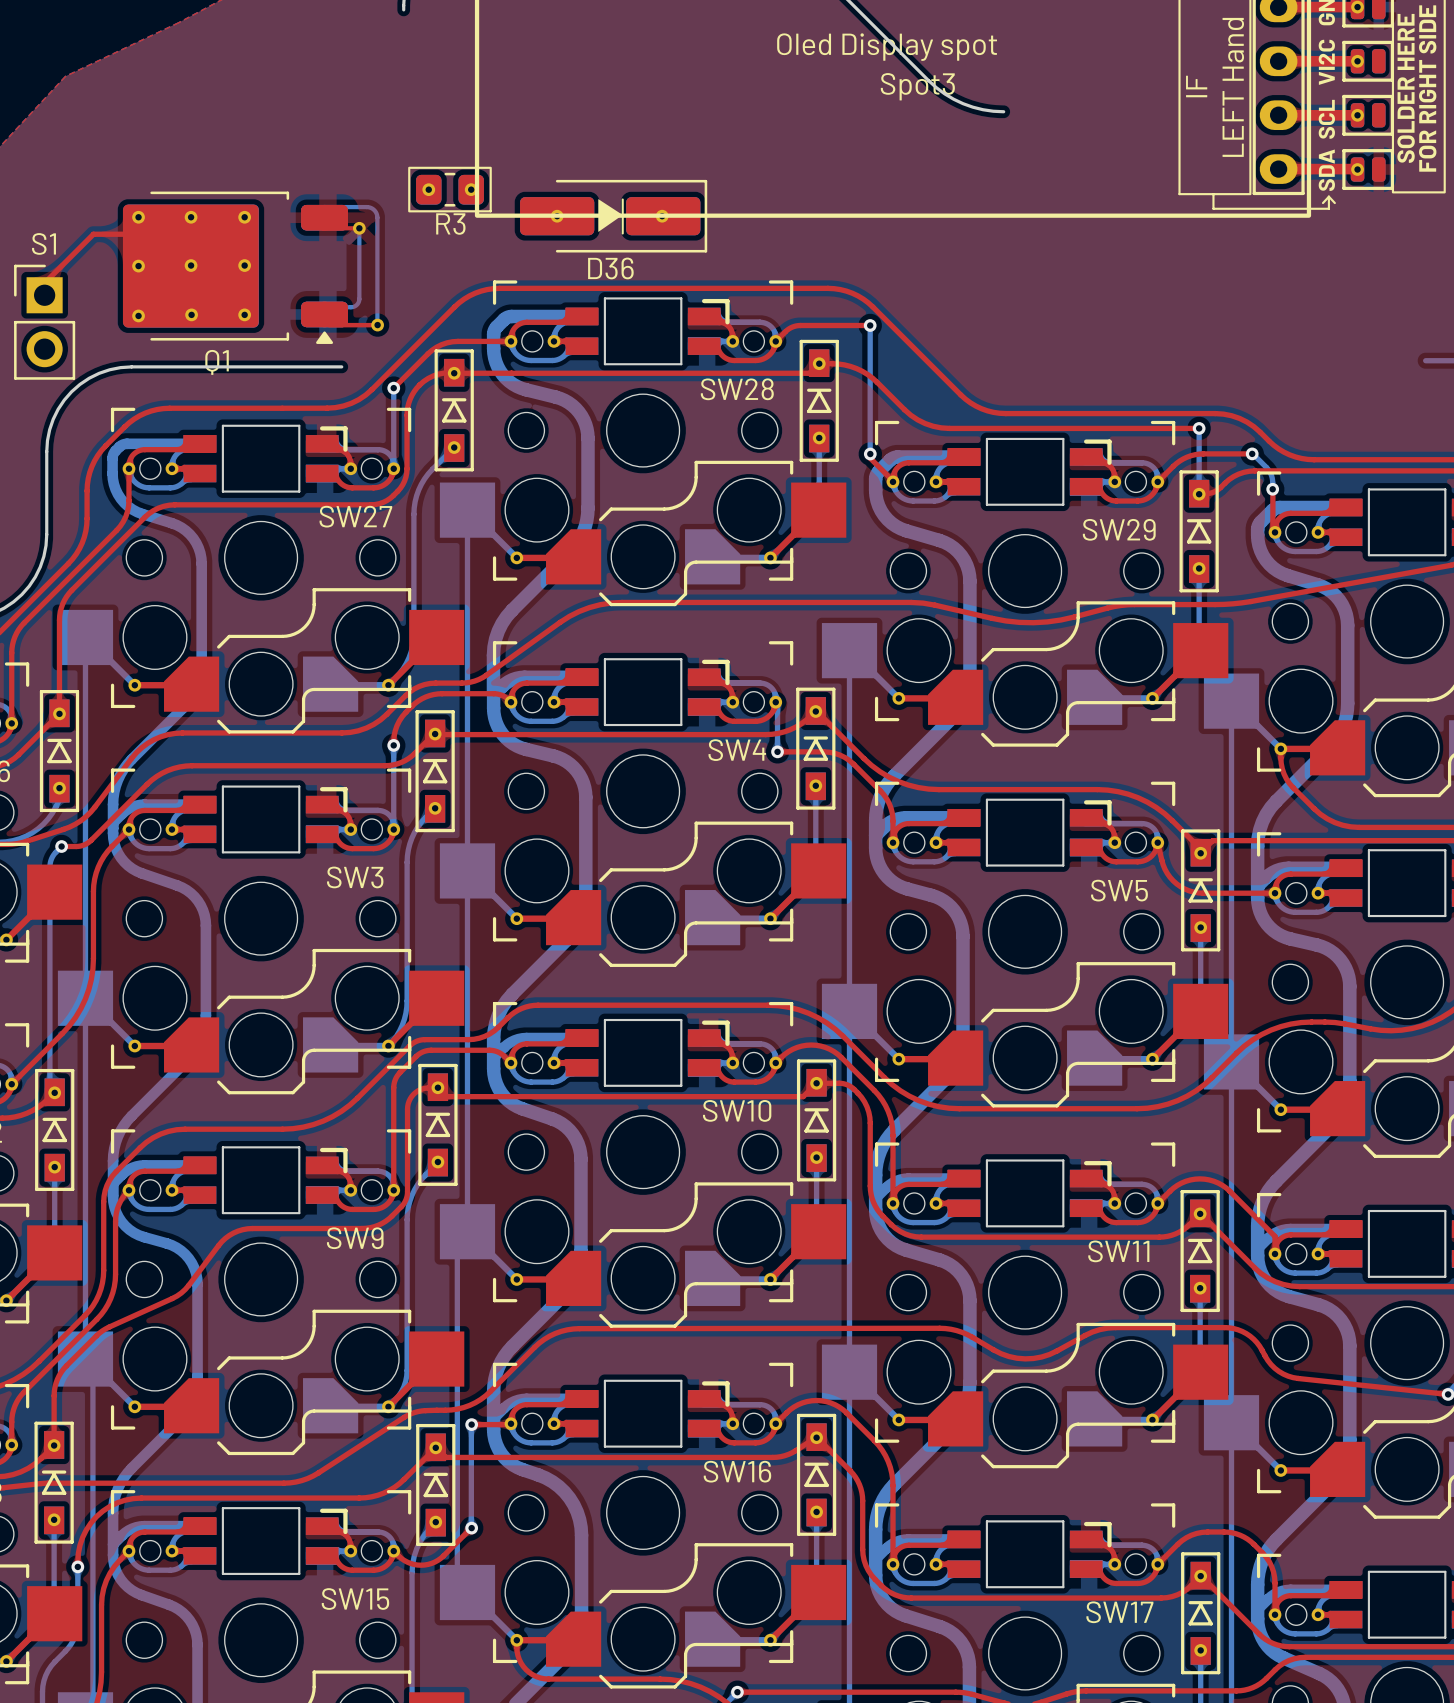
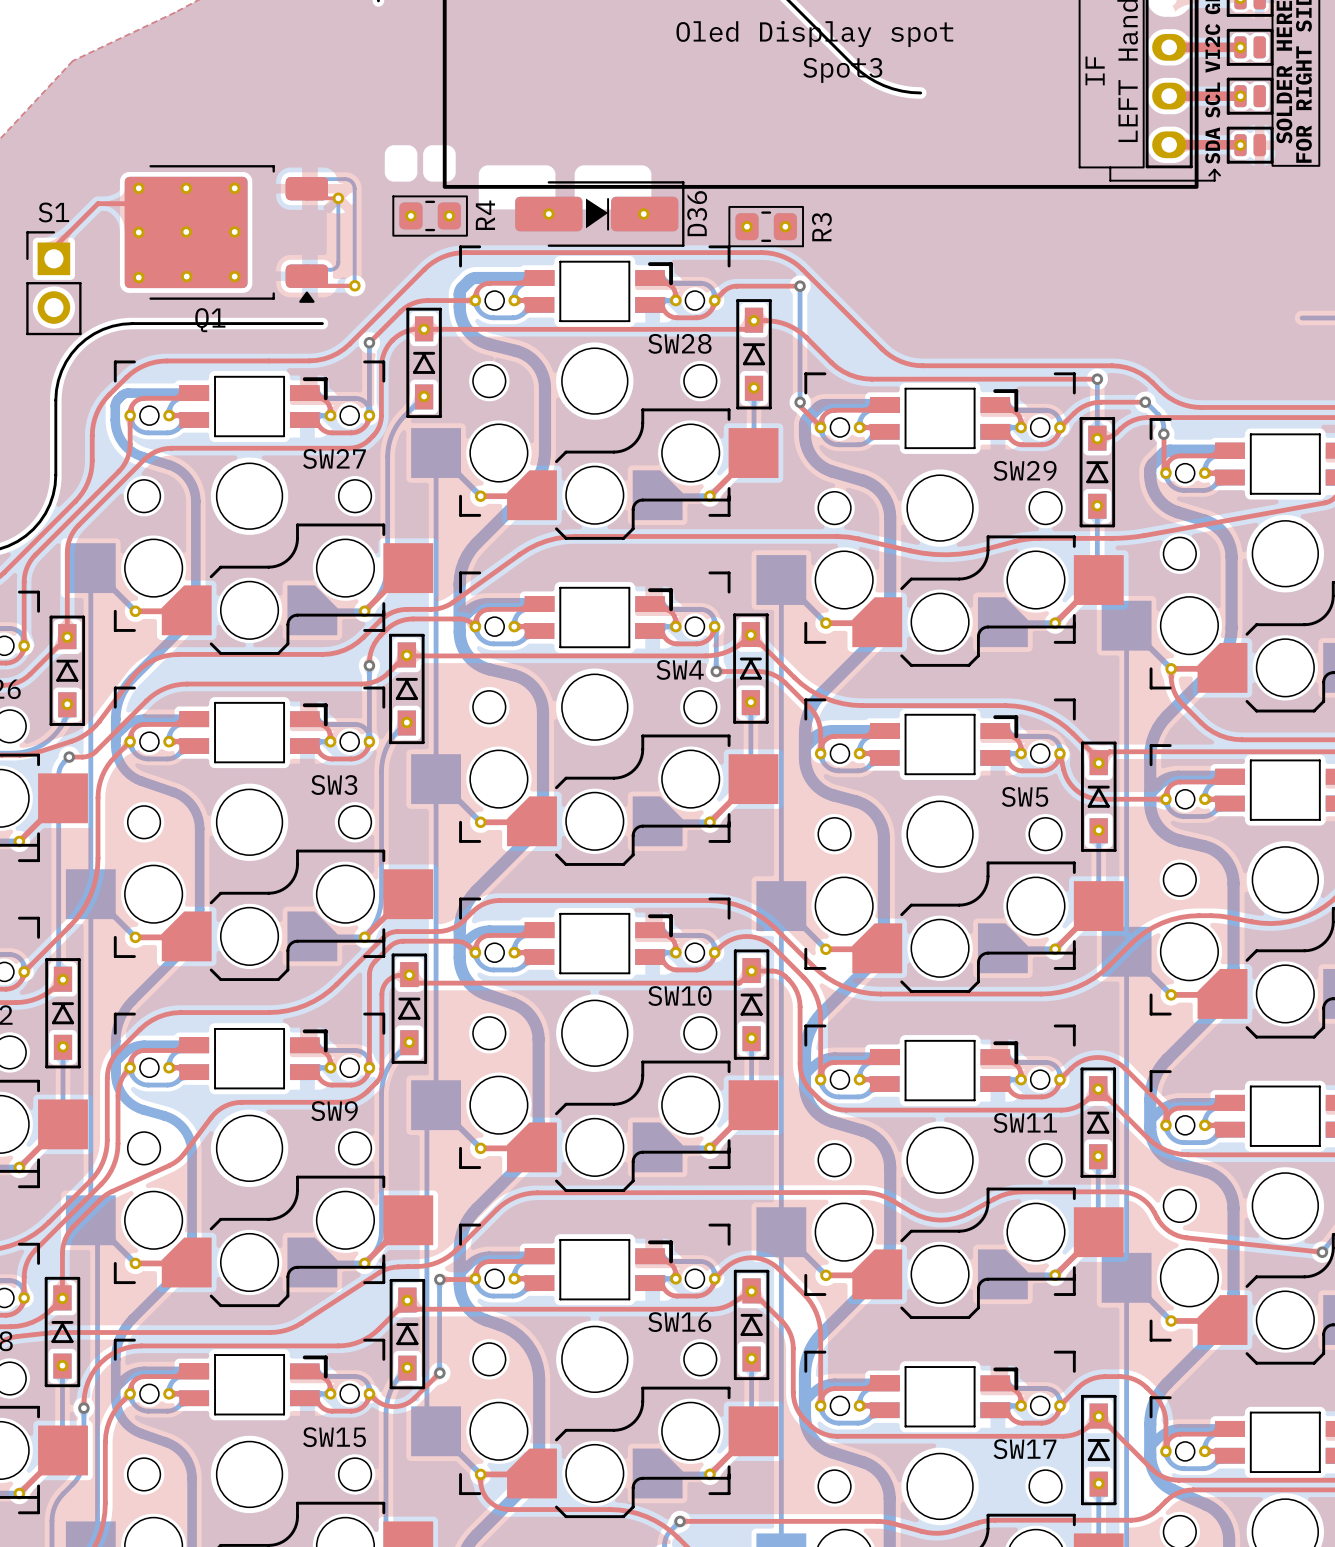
R3 position: (449, 189) -> (766, 226)
D36 position: (613, 216) -> (599, 214)
R3 name rotation: 0° (450, 224) -> 90° counterclockwise (821, 227)
R3 name position: R3 (450, 224) -> R3 (821, 227)
R4: none -> (430, 216)
D36 name rotation: 0° (610, 268) -> 90° counterclockwise (697, 213)
D36 name position: D36 (610, 268) -> D36 (697, 213)

